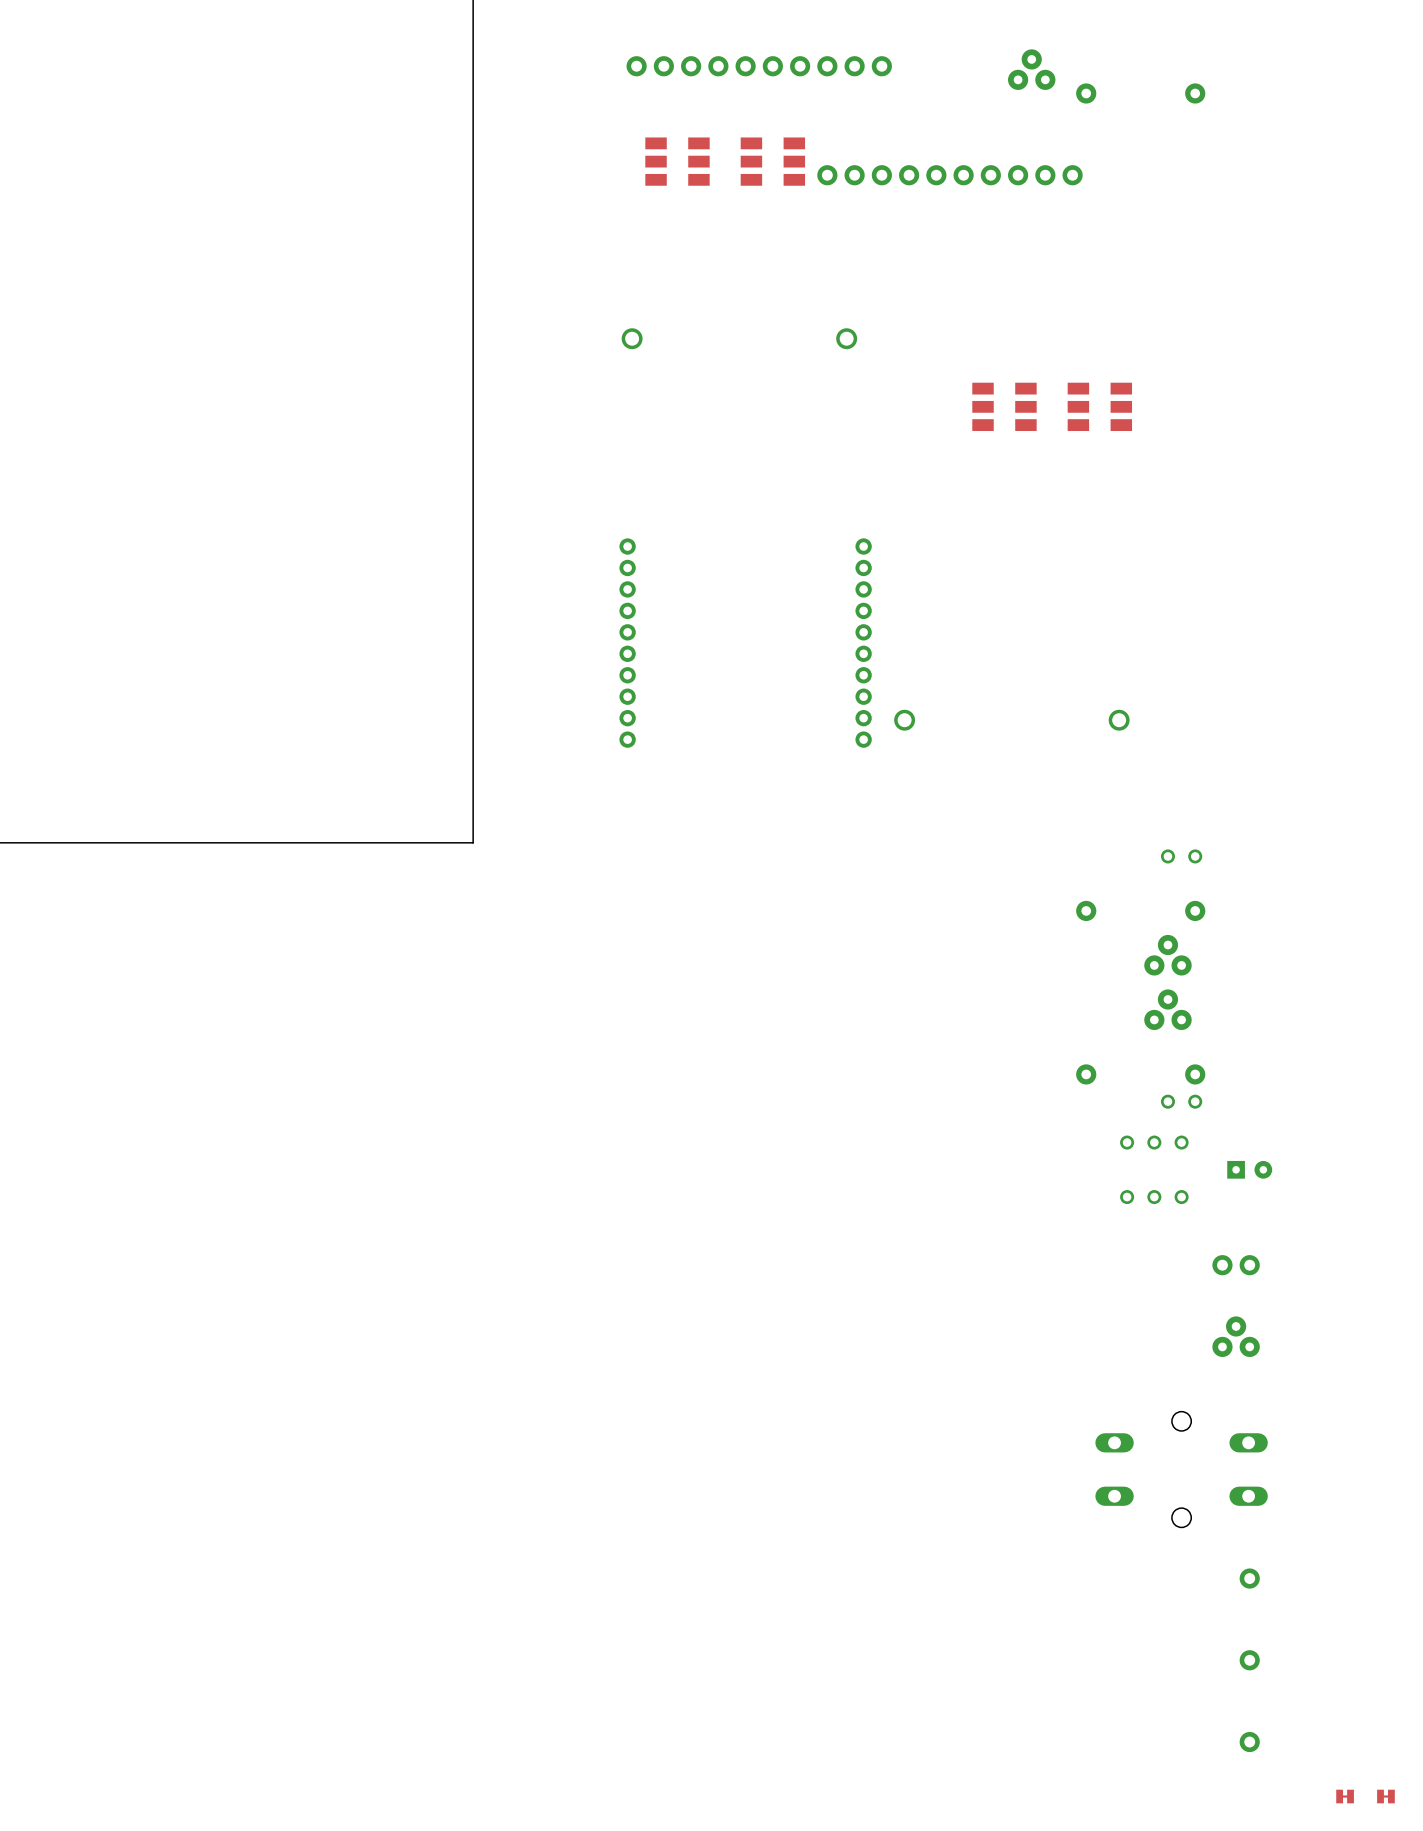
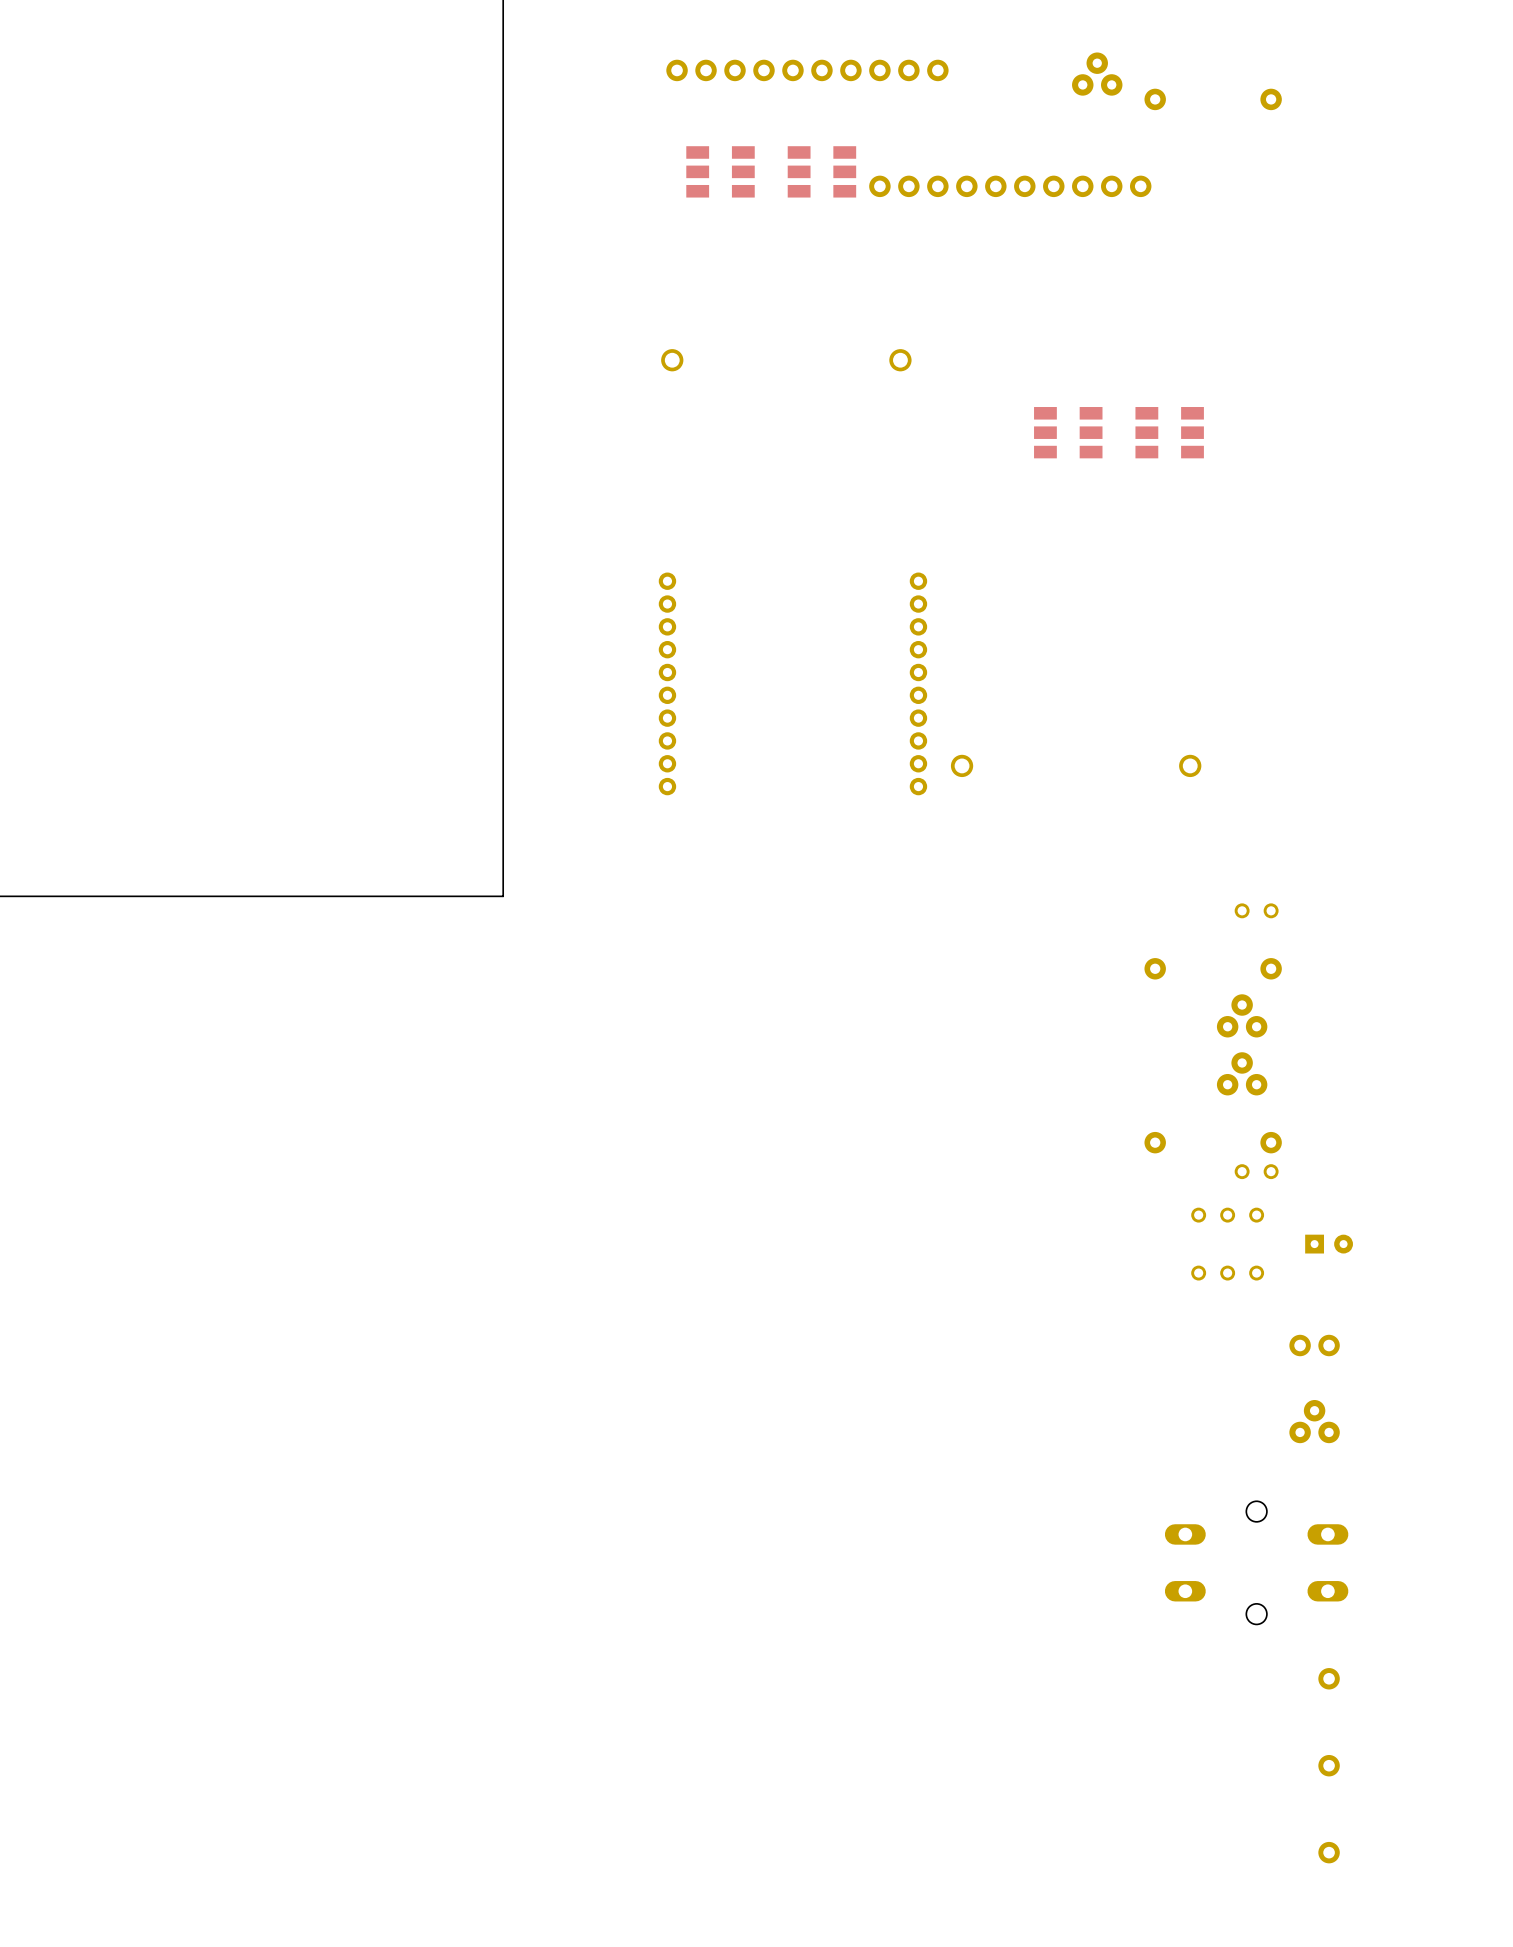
part: (1345, 1796) -> none
part: (1385, 1796) -> none

